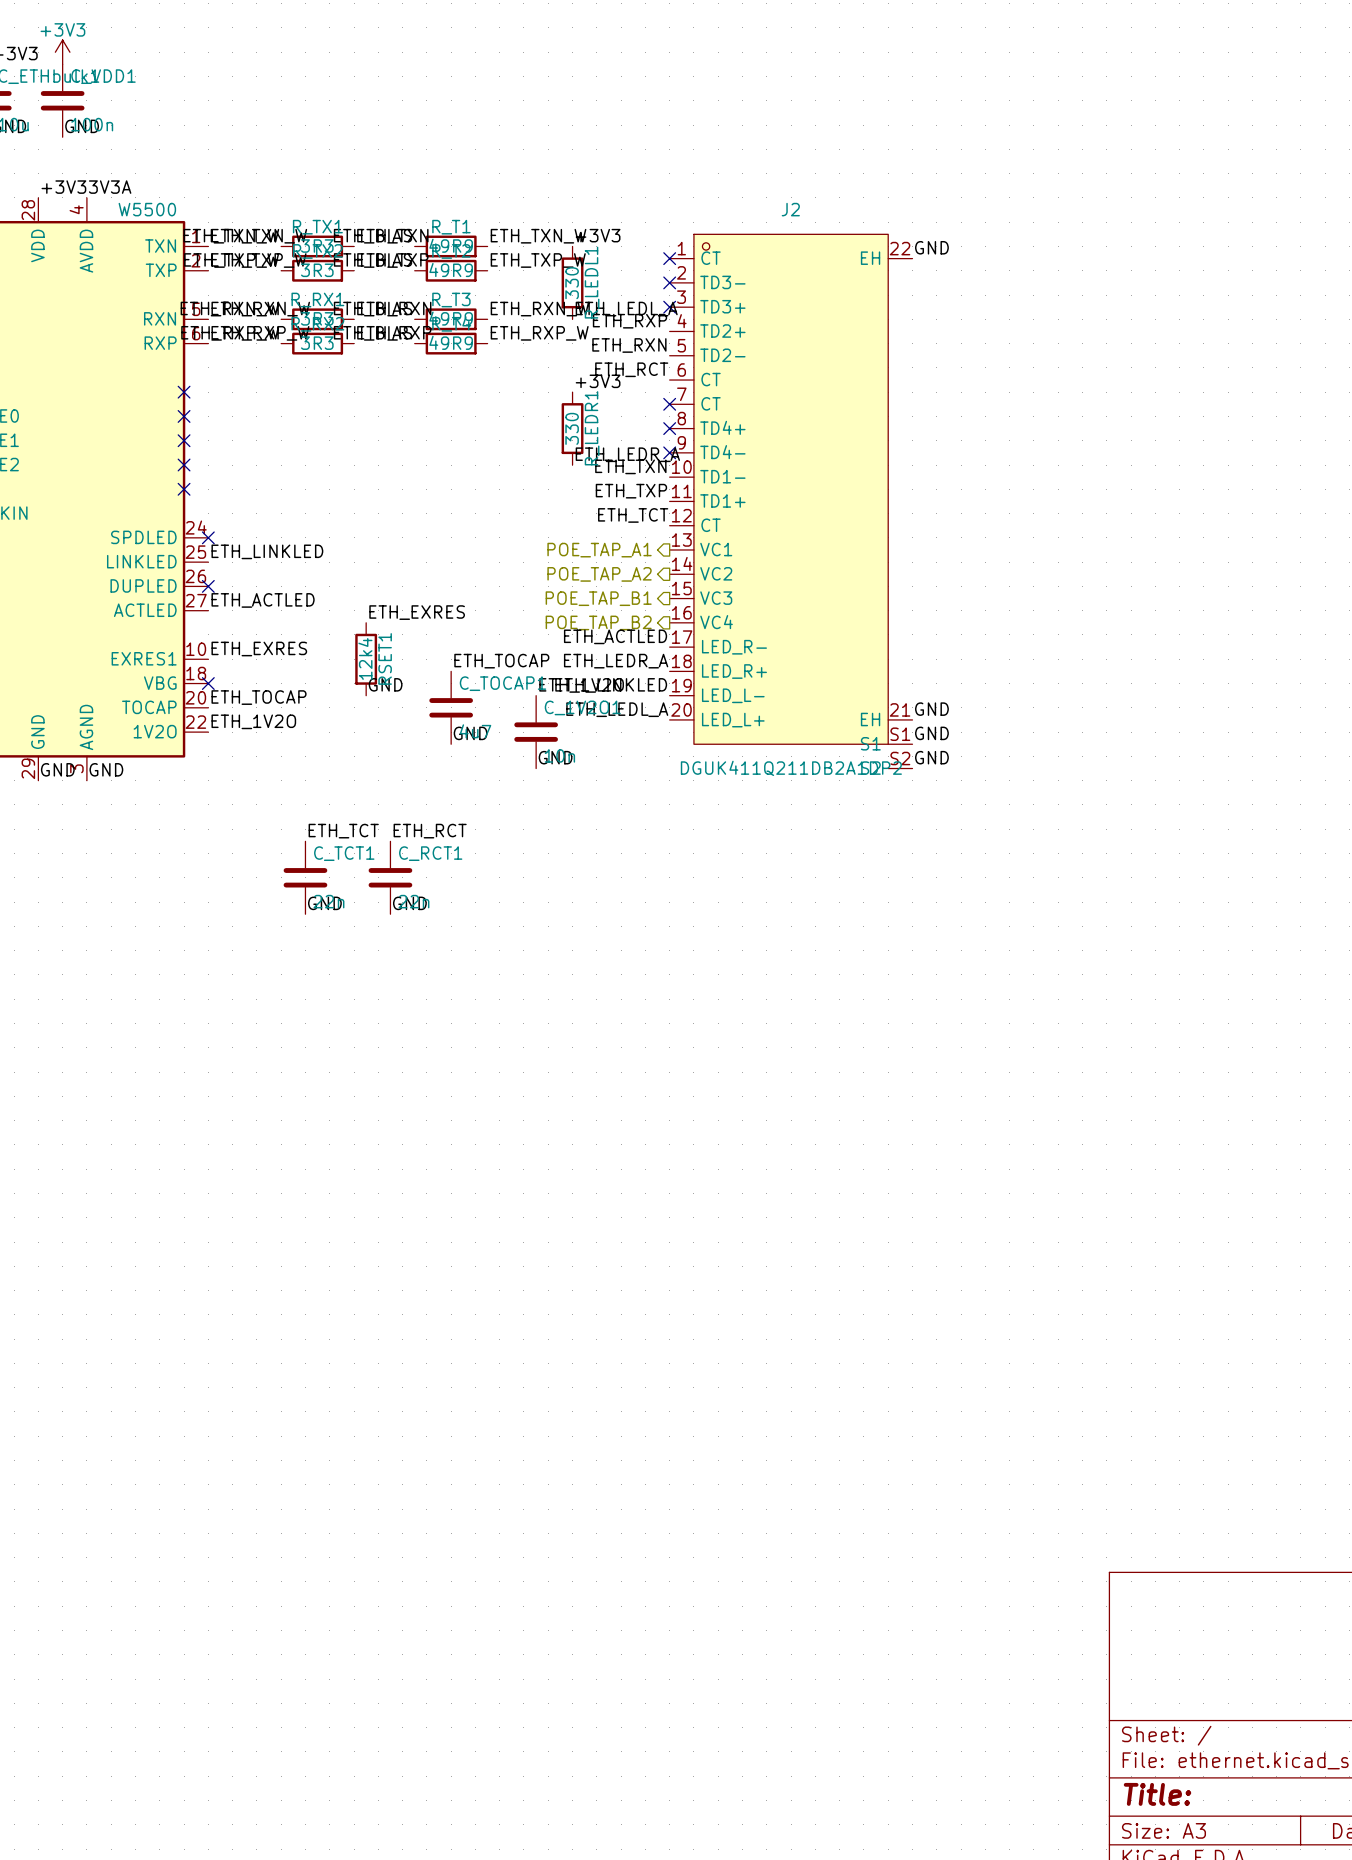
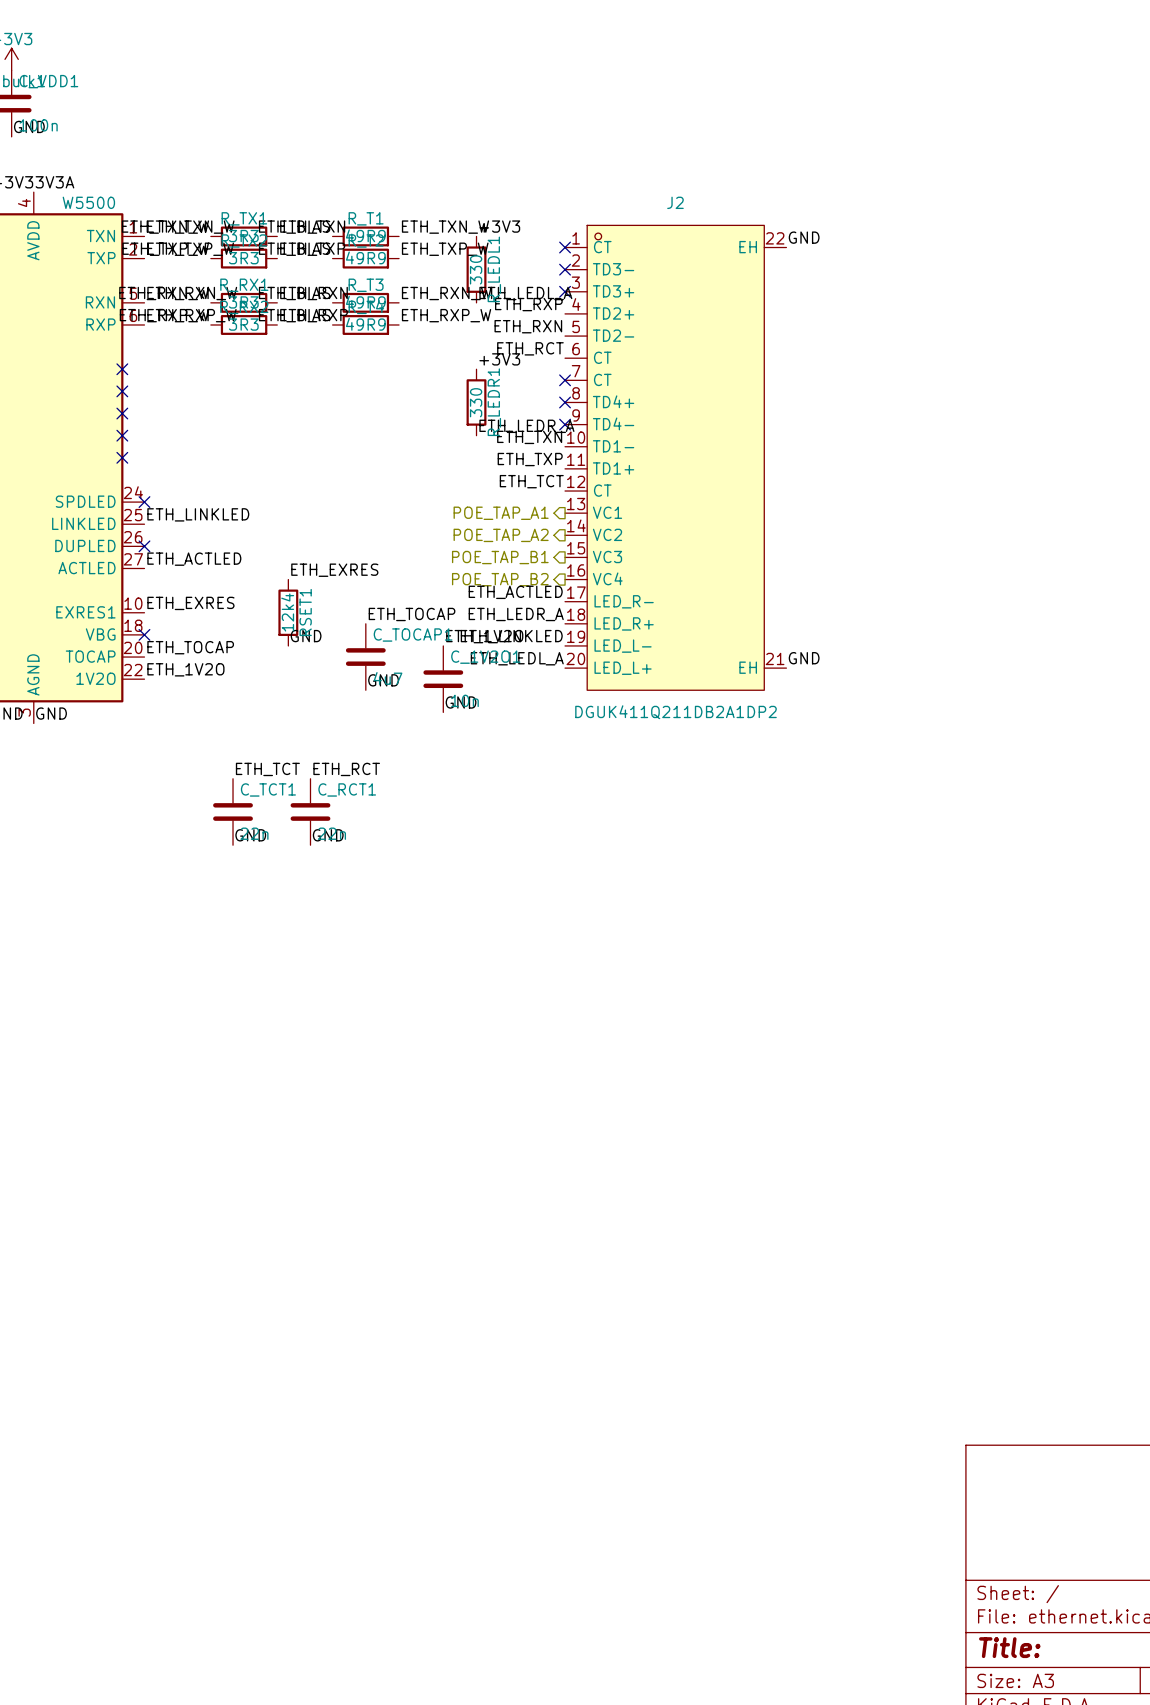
J2 symbol: [669, 234, 913, 769] -> [565, 225, 787, 691]
label: GND (931, 733) -> none
label: GND (931, 757) -> none

